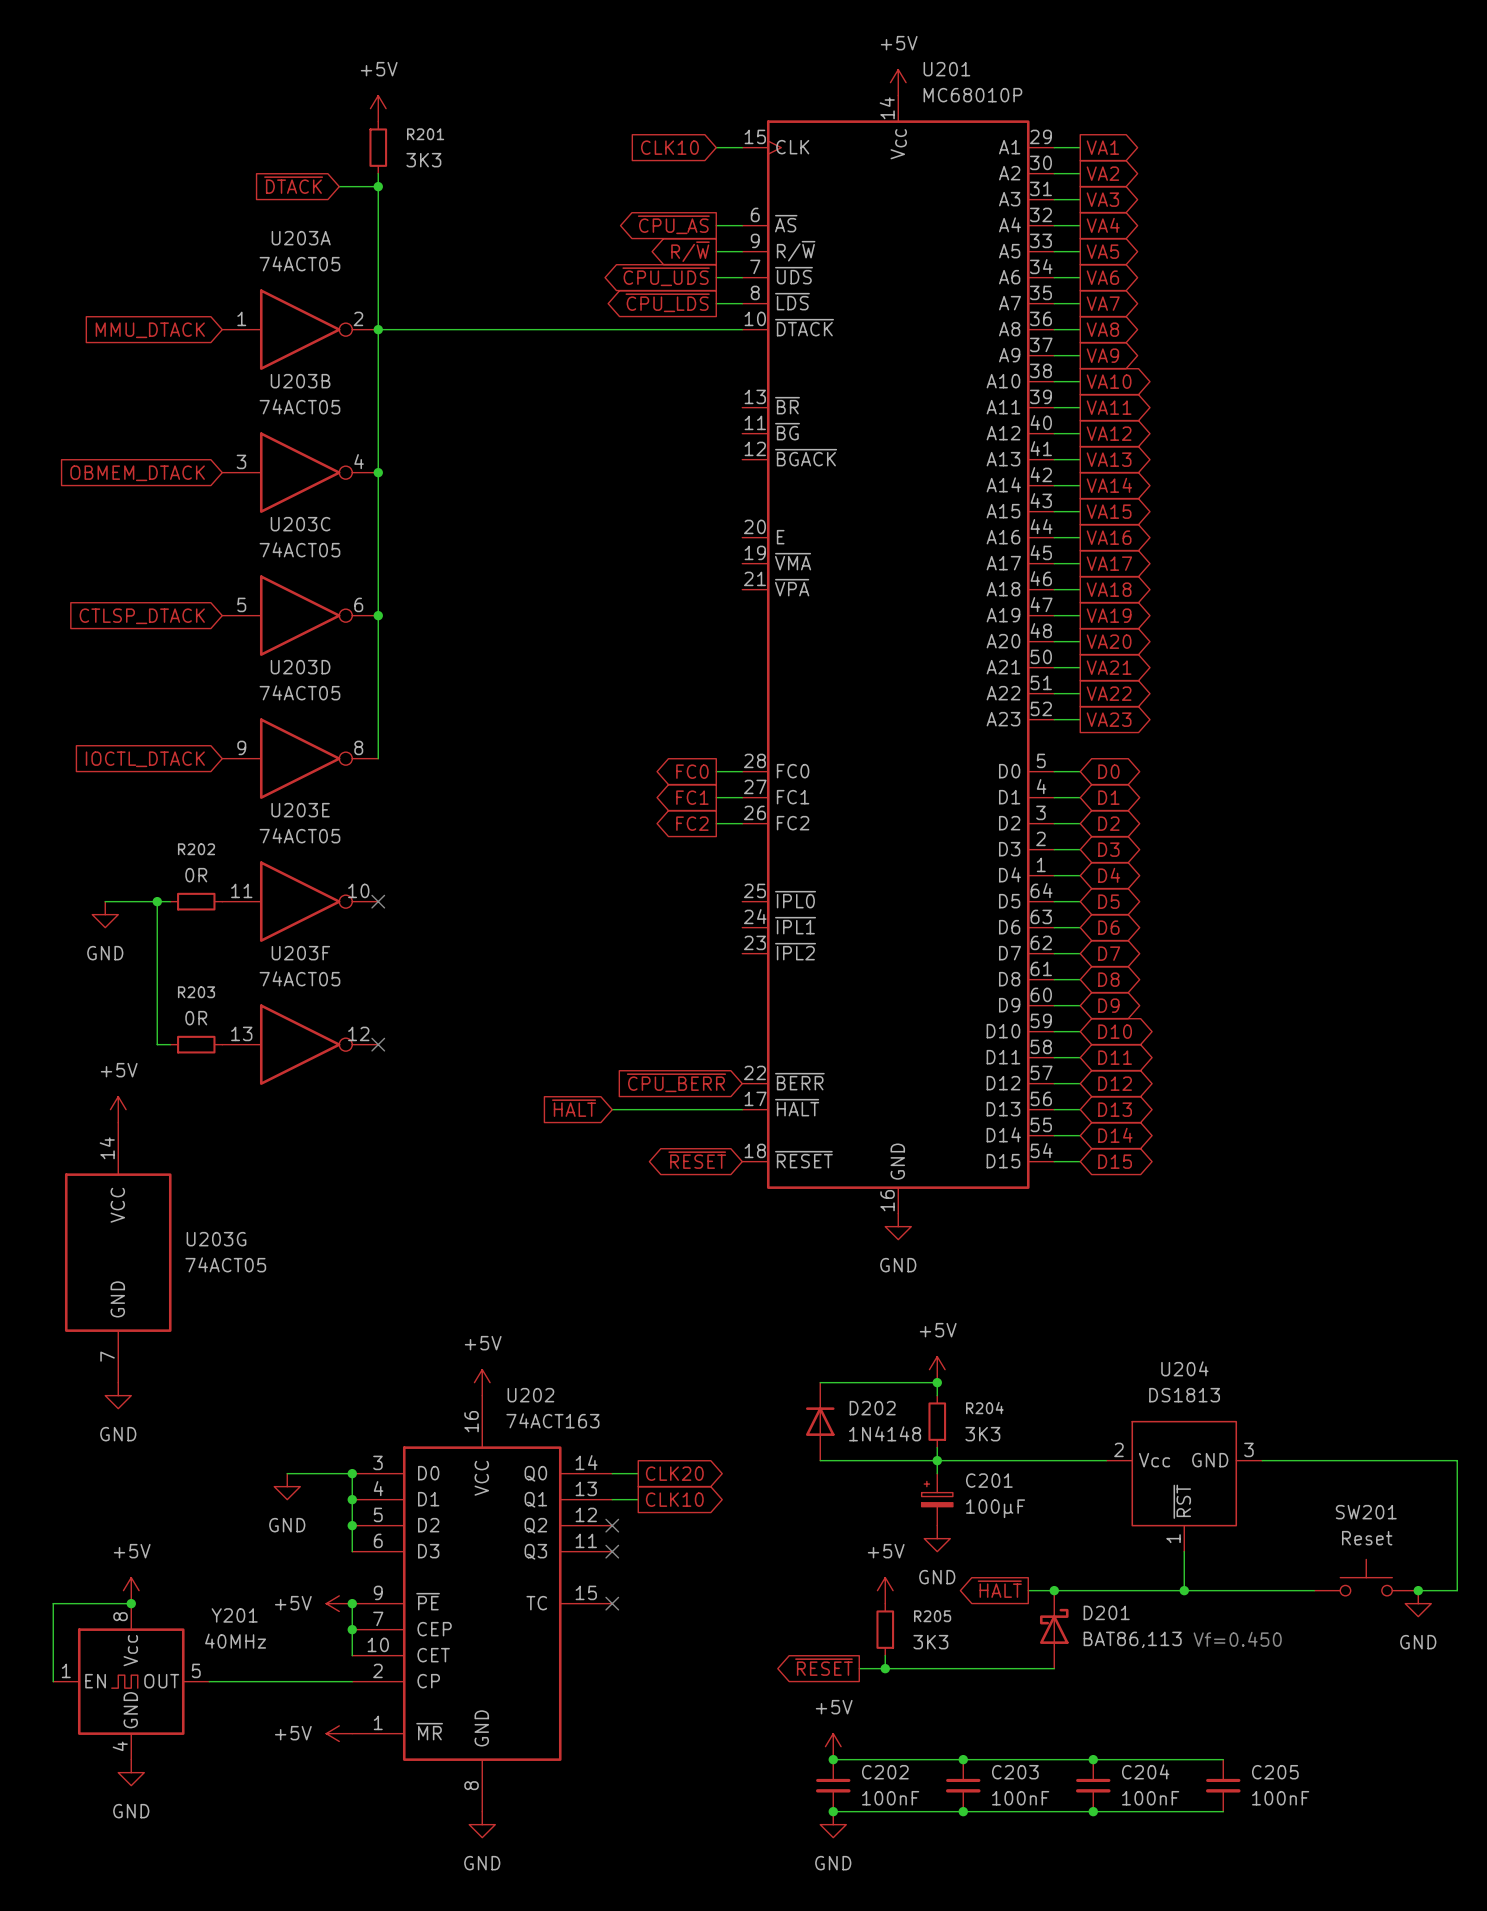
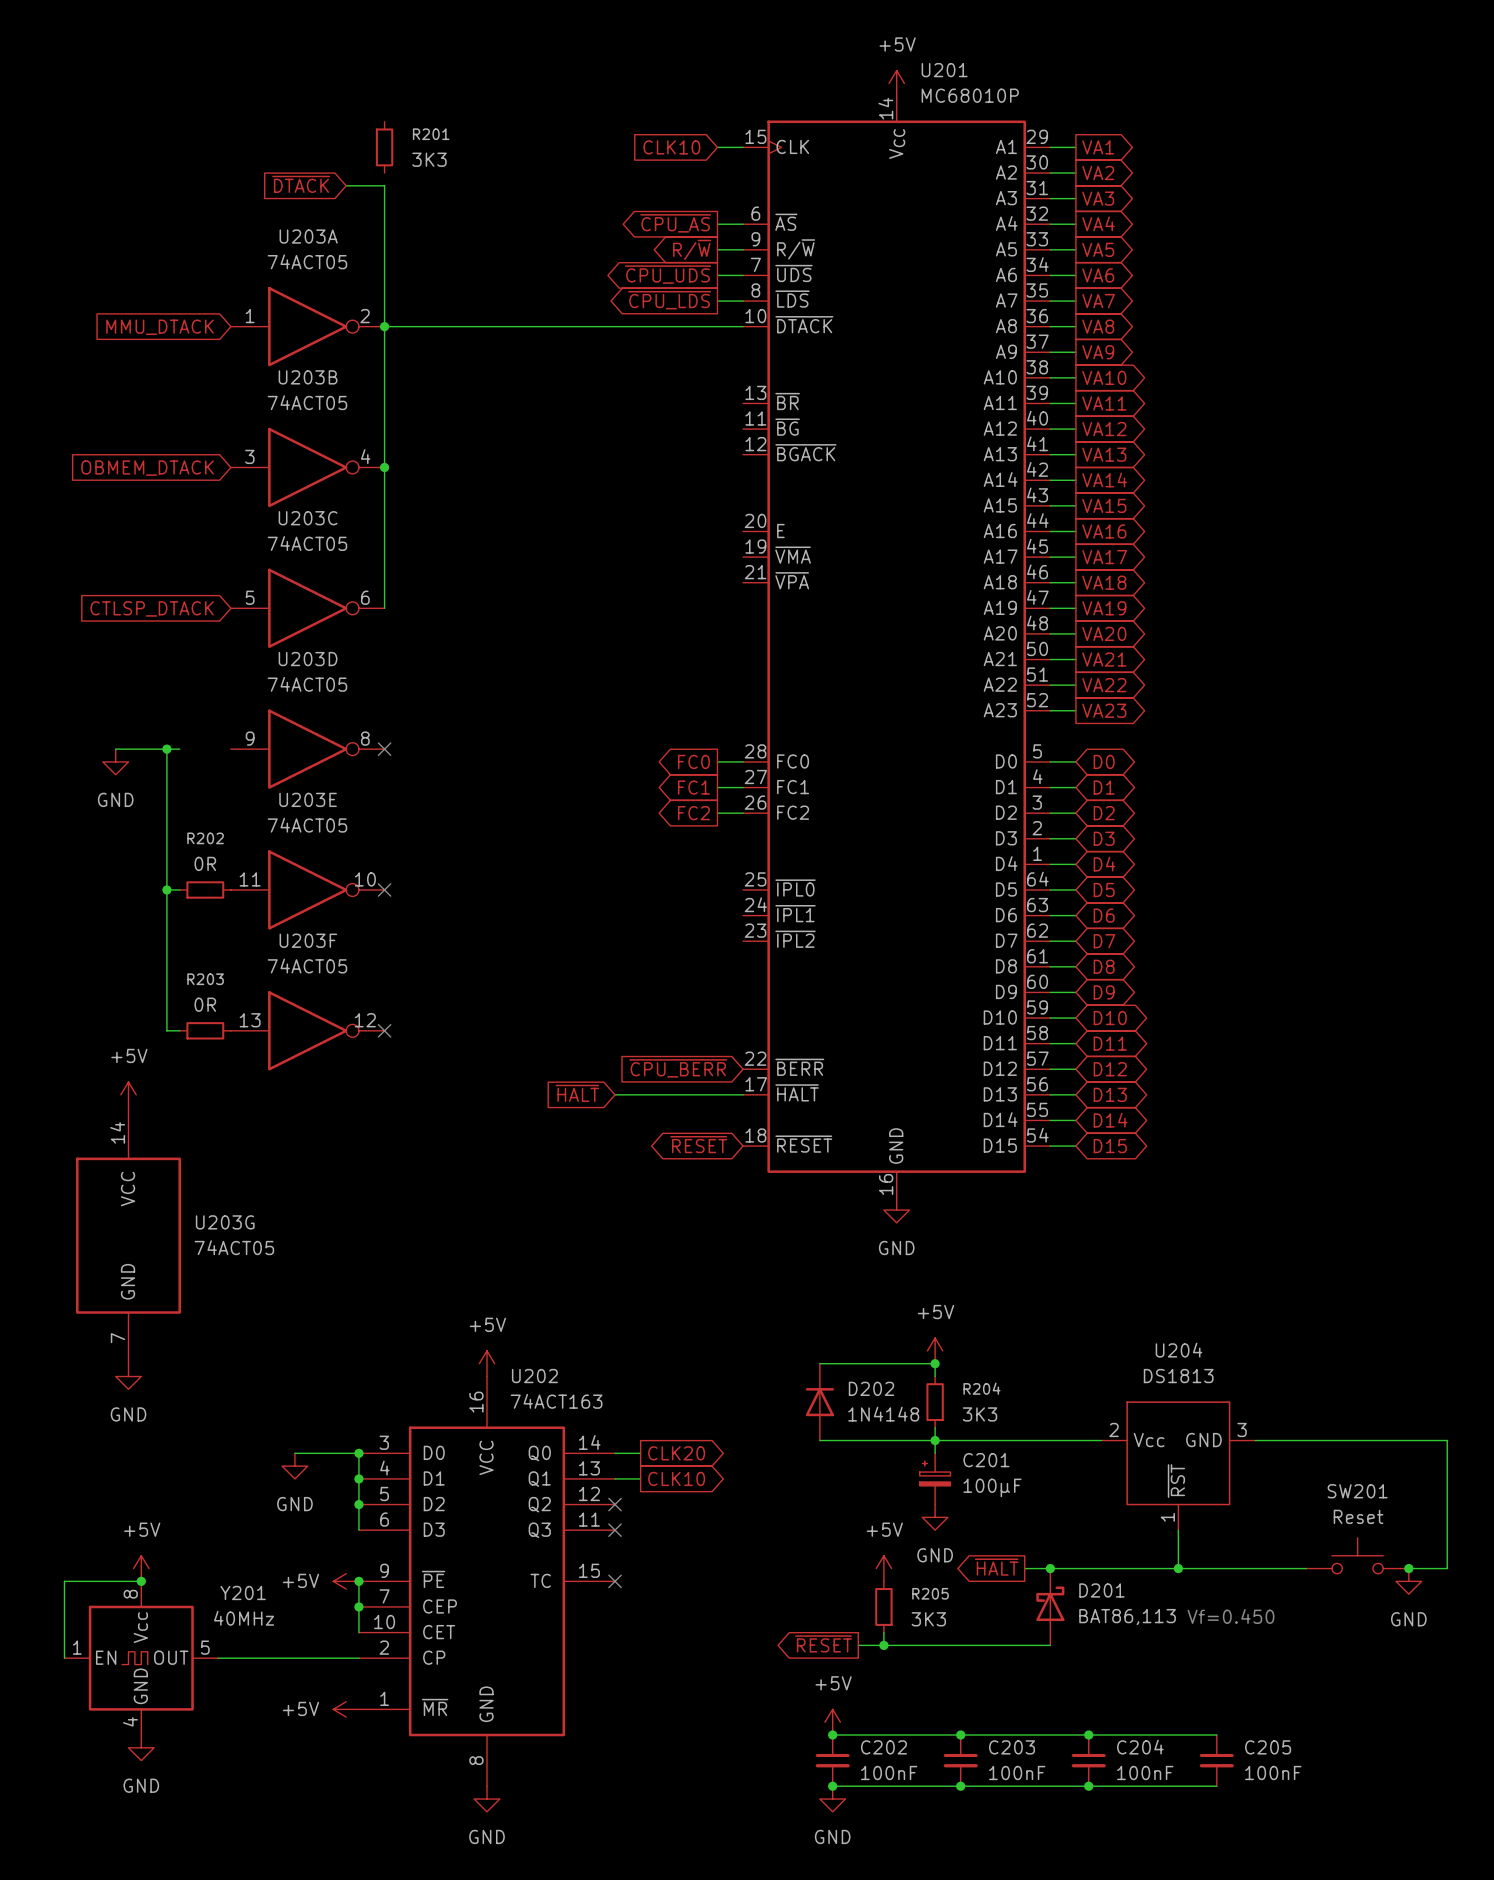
power symbol: +5V (378, 108) -> none
wire: (378, 173) (378, 186) -> none
junction: (378, 186) -> none
wire: (378, 615) (378, 758) -> none
junction: (378, 615) -> none
wire: none -> (115, 749) (179, 749)
junction: none -> (166, 749)
no-connect mark: none -> (384, 749)
global label: IOCTL_DTACK (145, 759) -> none
wire: (105, 901) (157, 901) -> (166, 749) (166, 889)
power symbol position: GND (105, 914) -> GND (115, 761)

